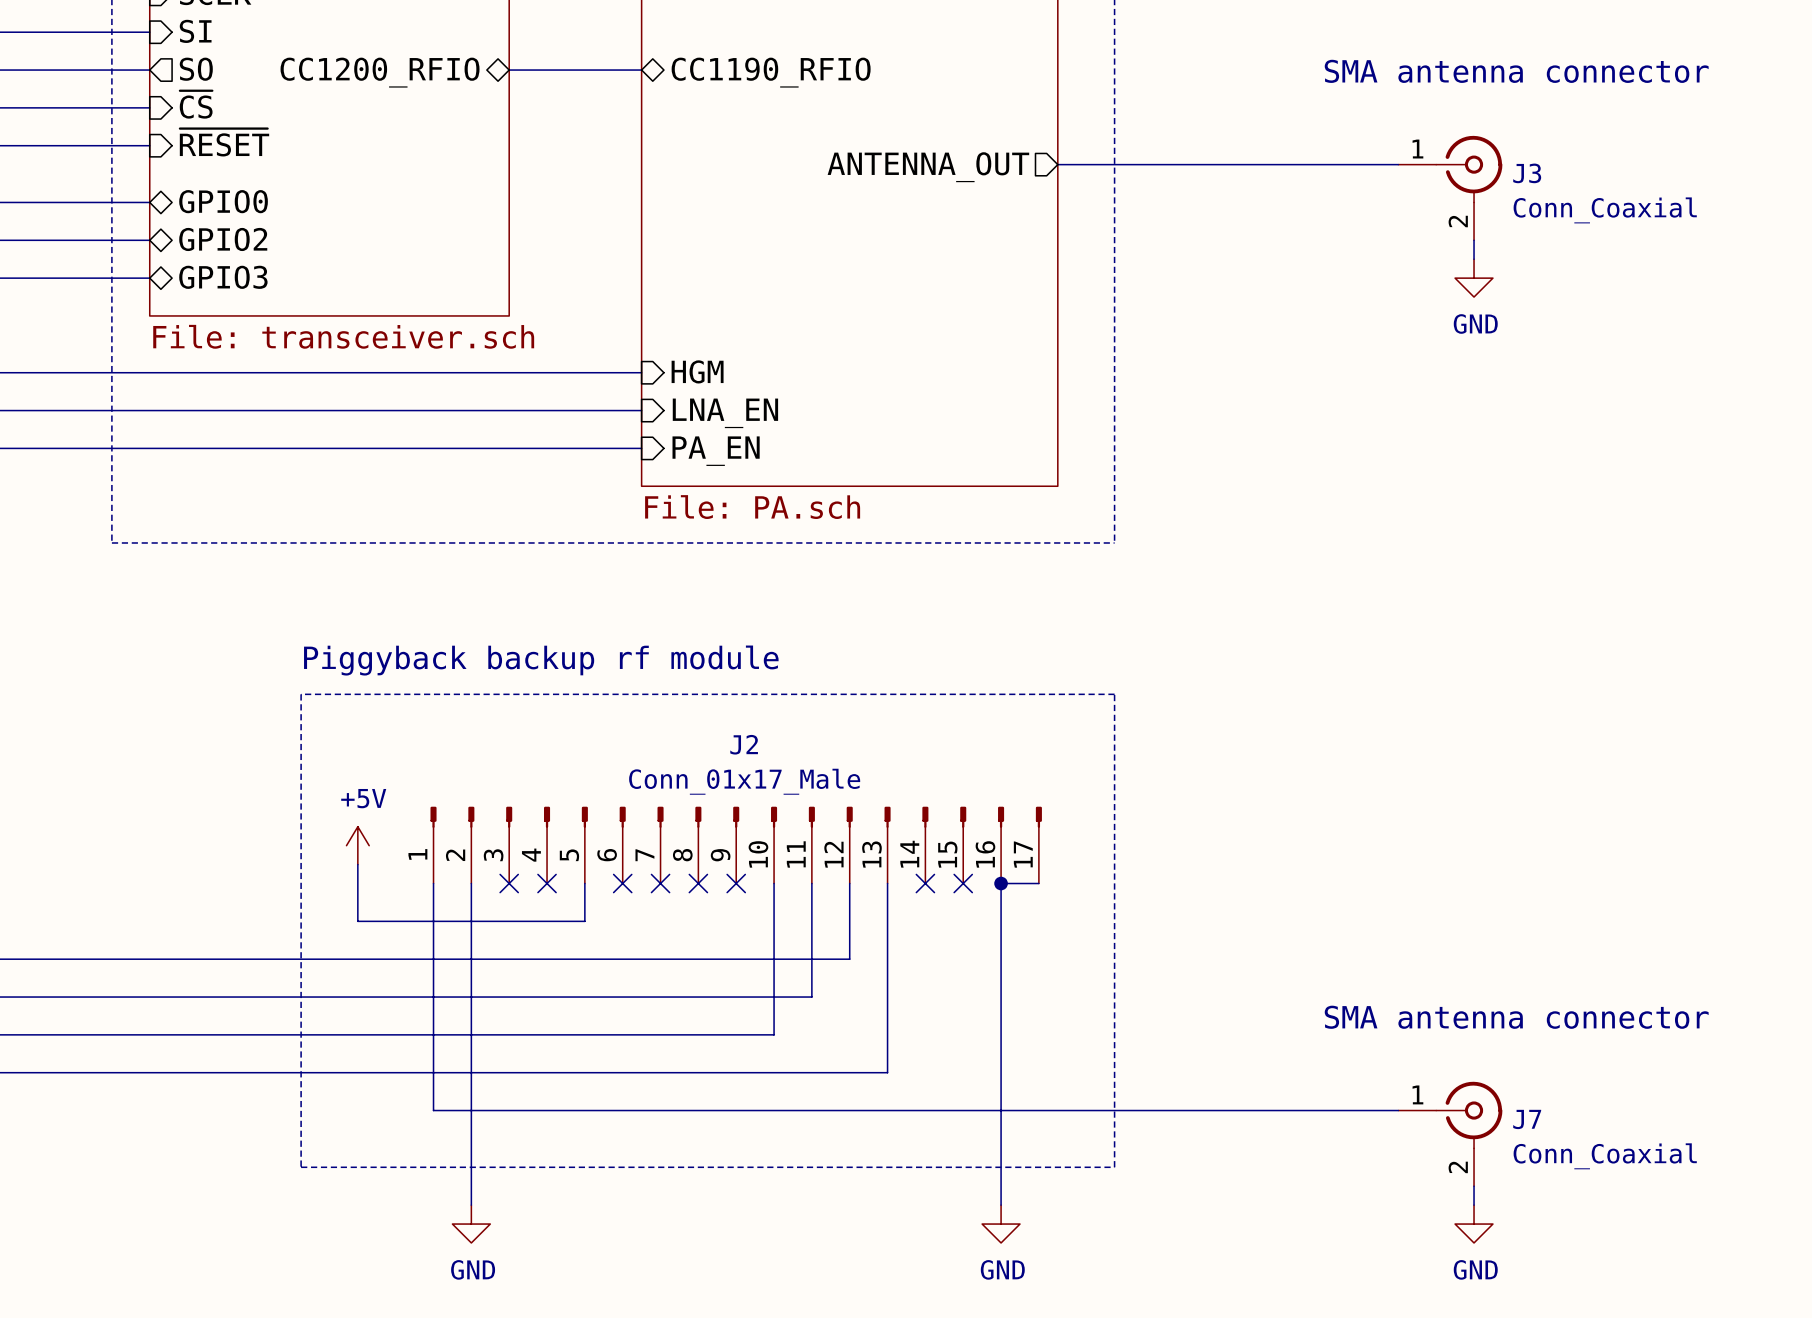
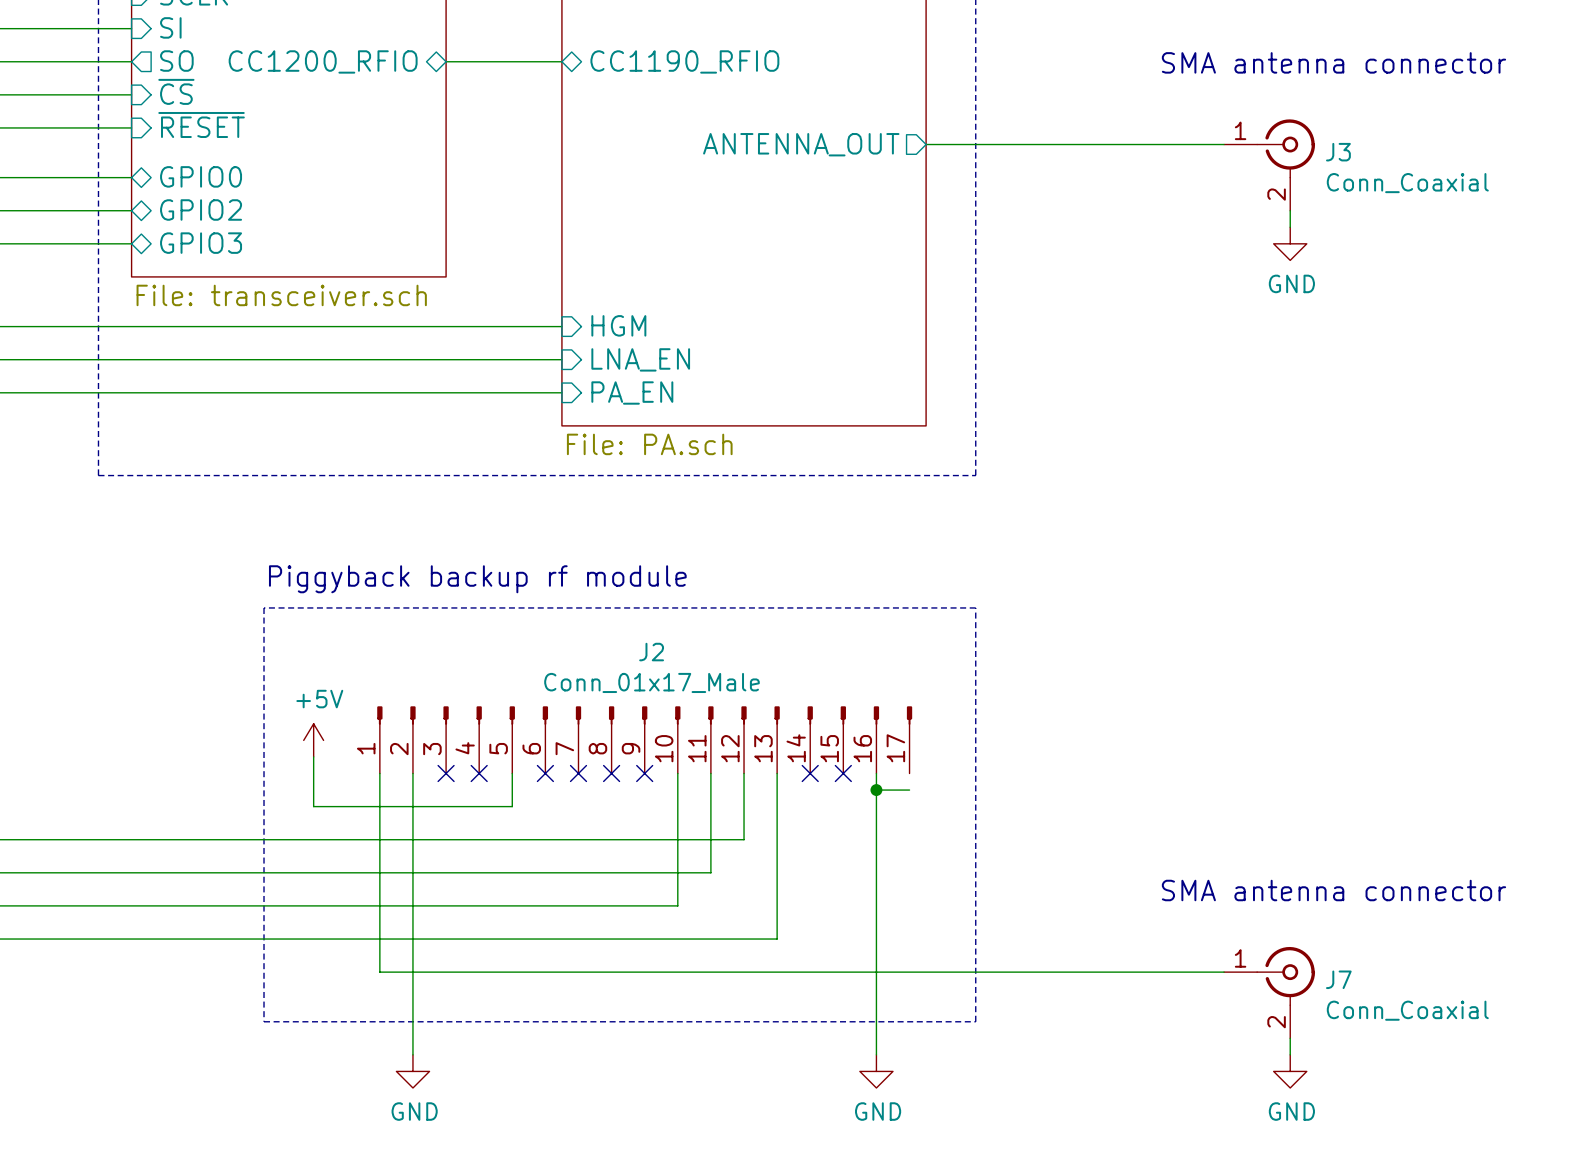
wire: (1001, 883) (1038, 883) -> (876, 790) (909, 790)
junction position: (1001, 883) -> (876, 790)

